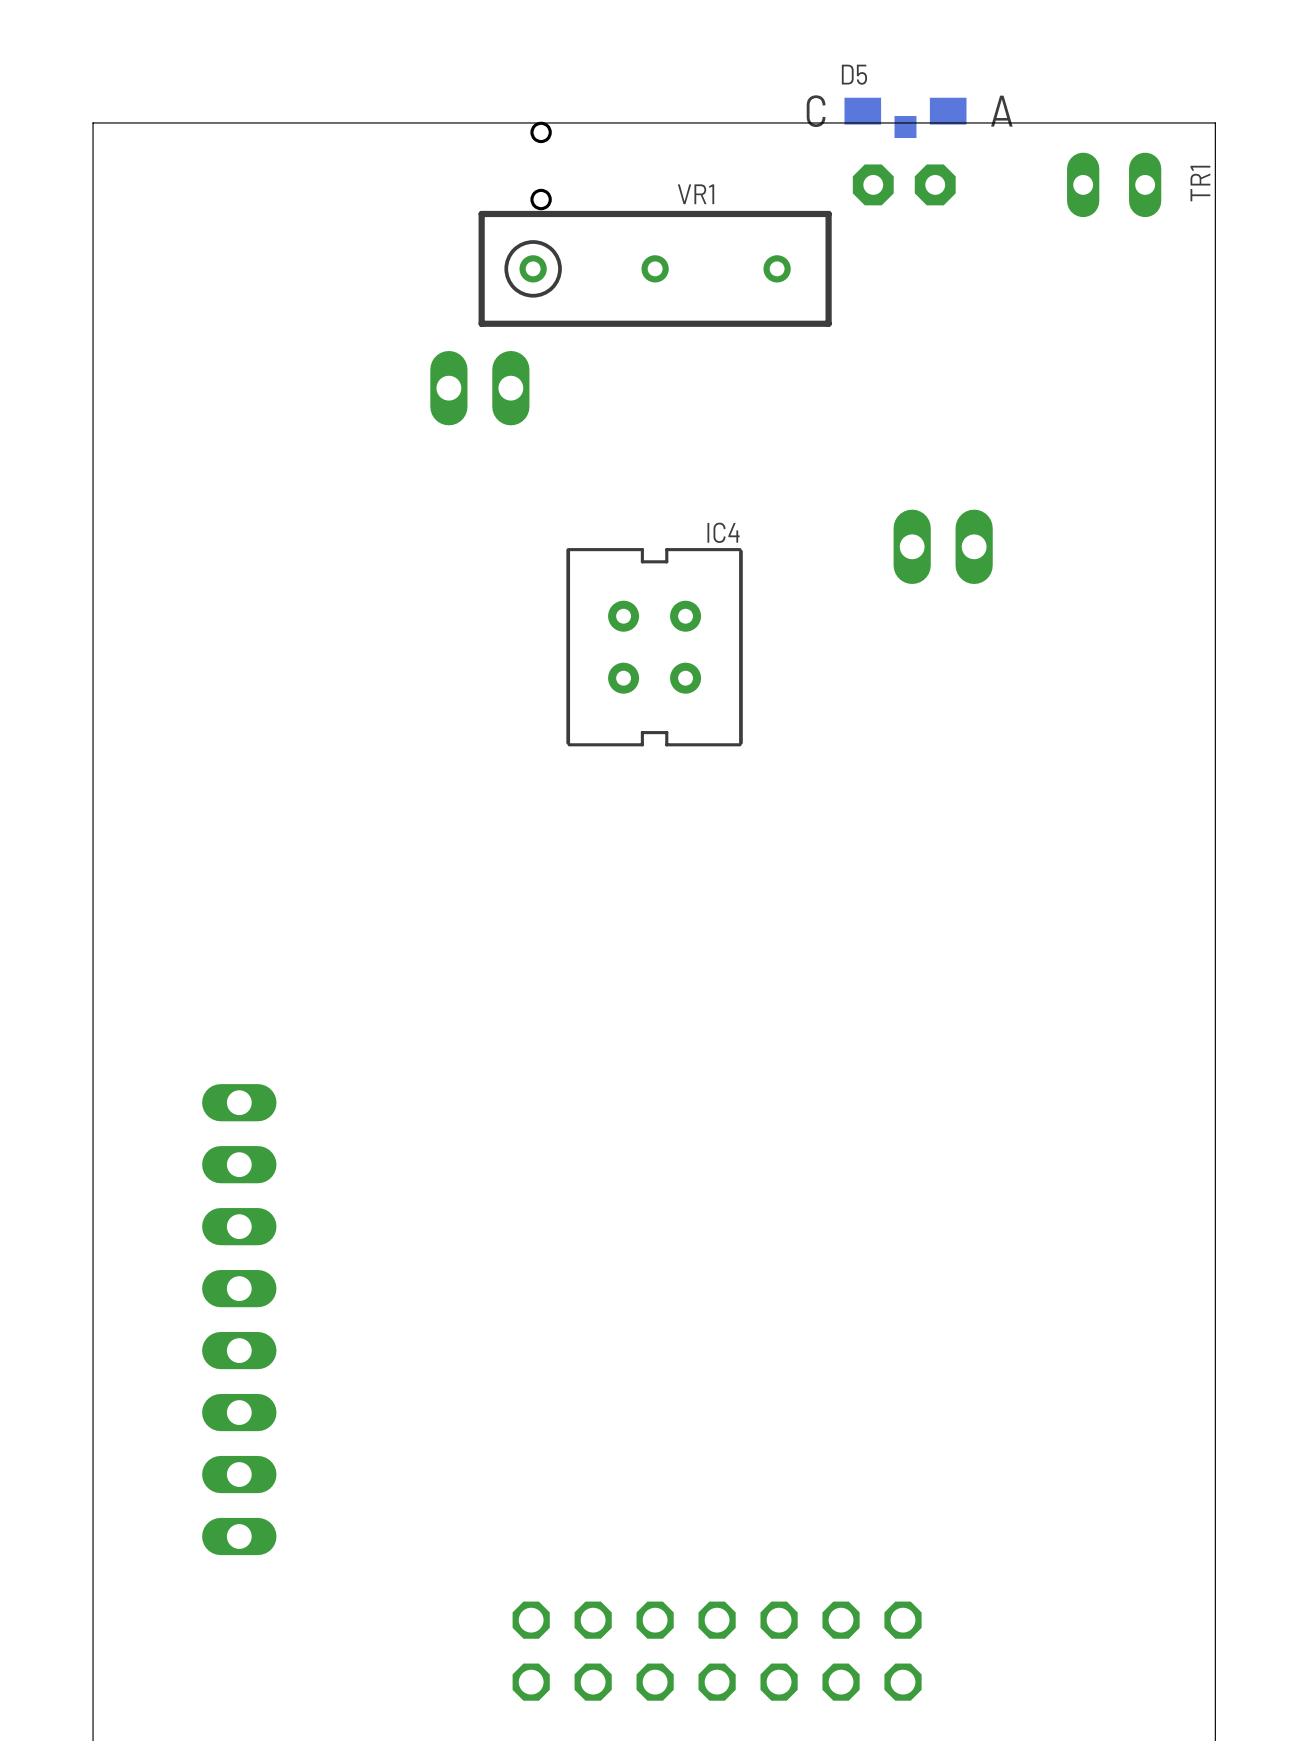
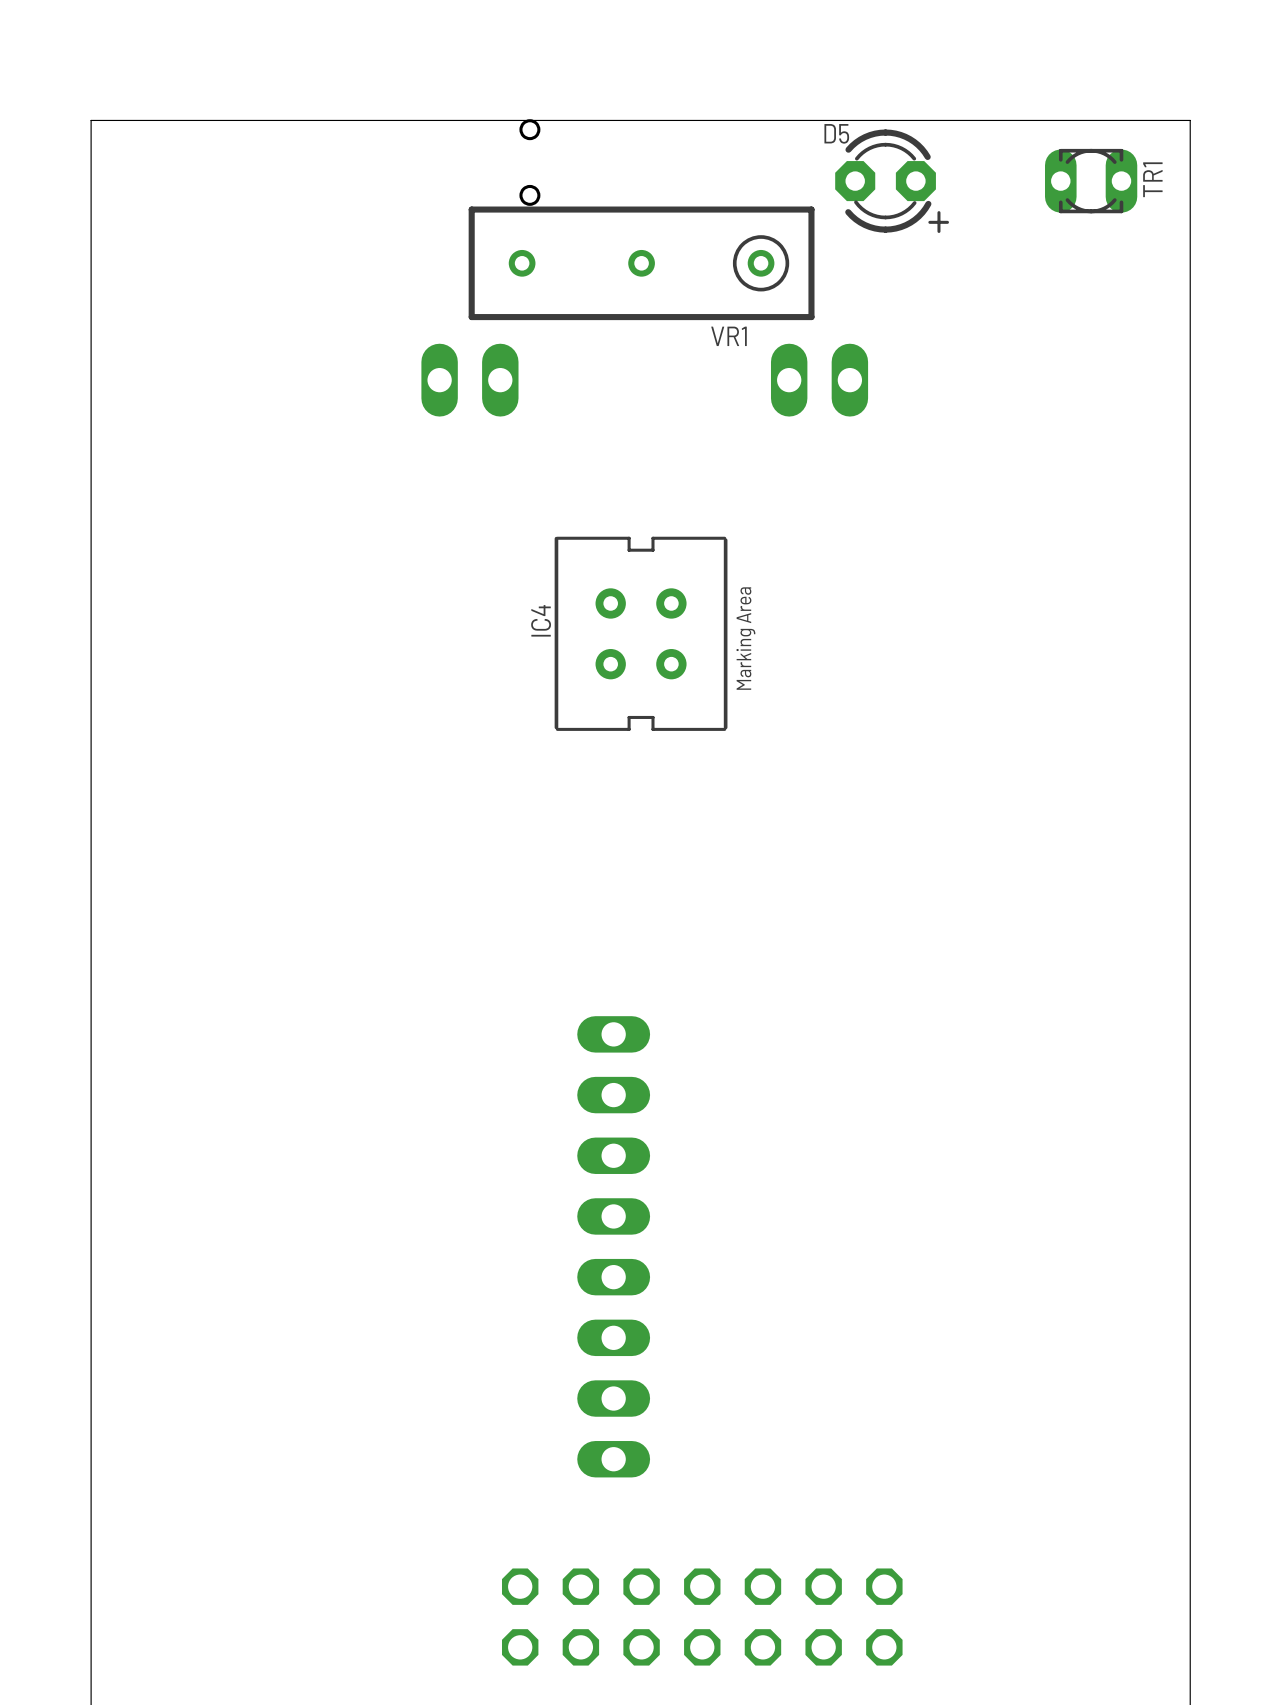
D5 name position: D5 (854, 74) -> D5 (836, 133)
part: (905, 117) -> none
TR1 footprint: [1067, 152, 1162, 218] -> [1045, 148, 1138, 214]
D5 footprint: [852, 164, 956, 206] -> [835, 129, 949, 233]
VR1 name position: VR1 (696, 194) -> VR1 (729, 336)
VR1 rotation: 0° (655, 268) -> 180° (641, 263)
IC4 name rotation: 0° (723, 532) -> 90° counterclockwise (541, 620)
IC4 name position: IC4 (723, 532) -> IC4 (541, 620)
part position: (943, 546) -> (819, 380)
IC4 text: none -> Marking Area (745, 638)
part position: (239, 1319) -> (613, 1246)

